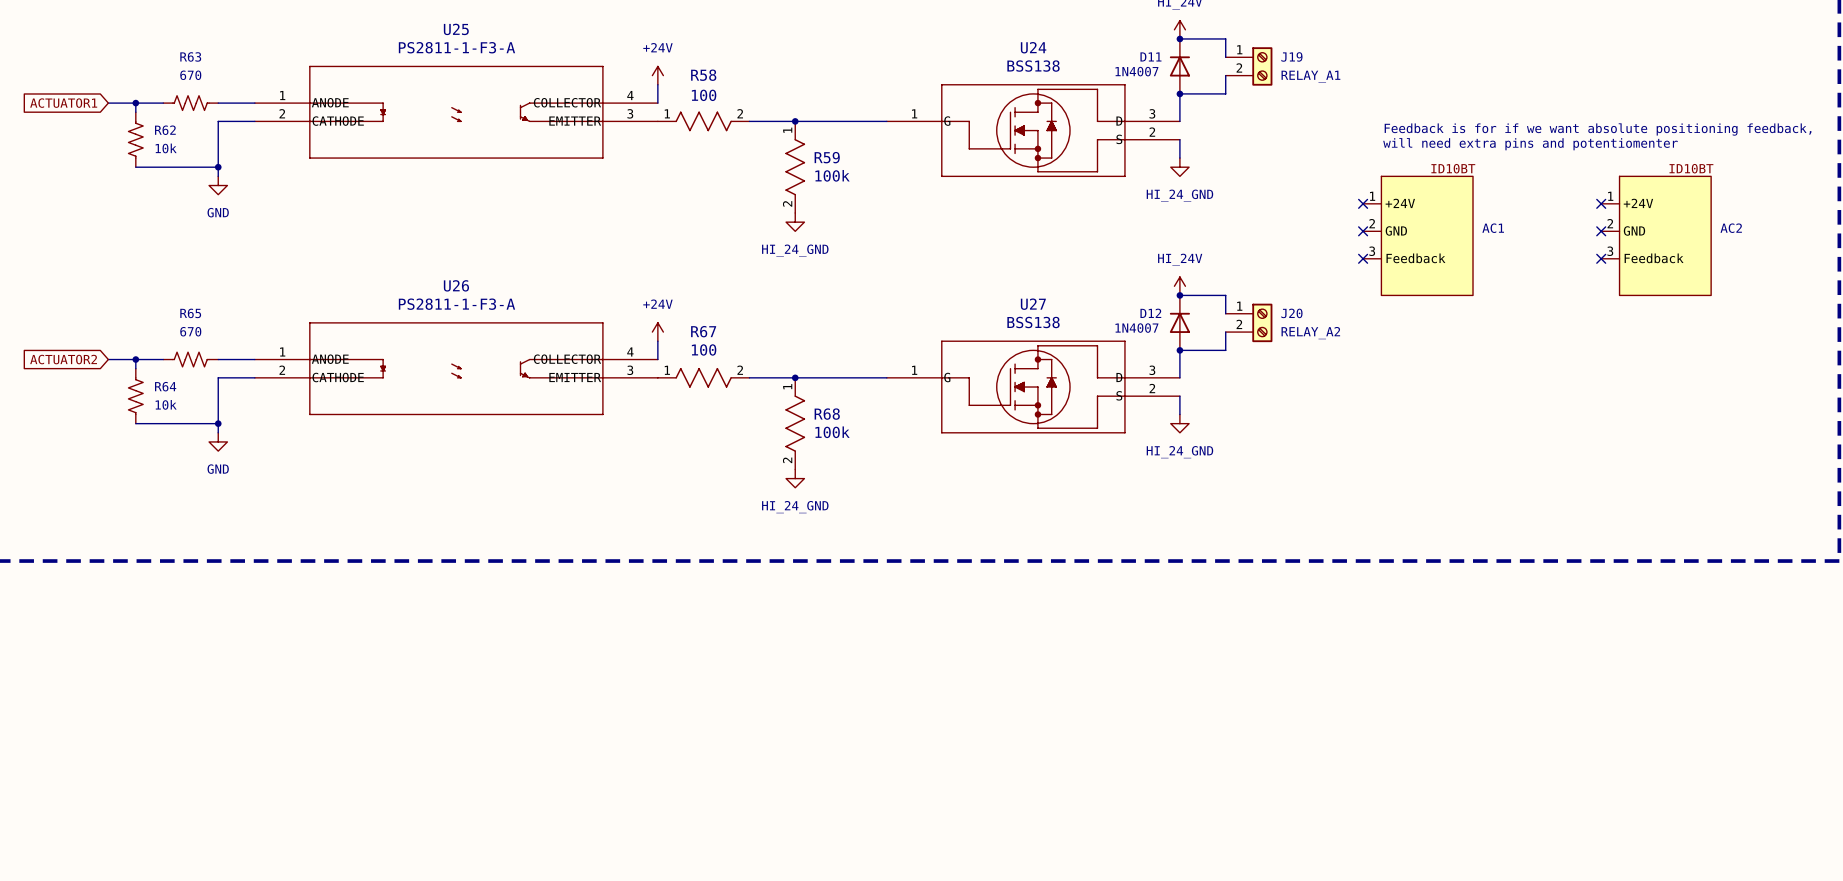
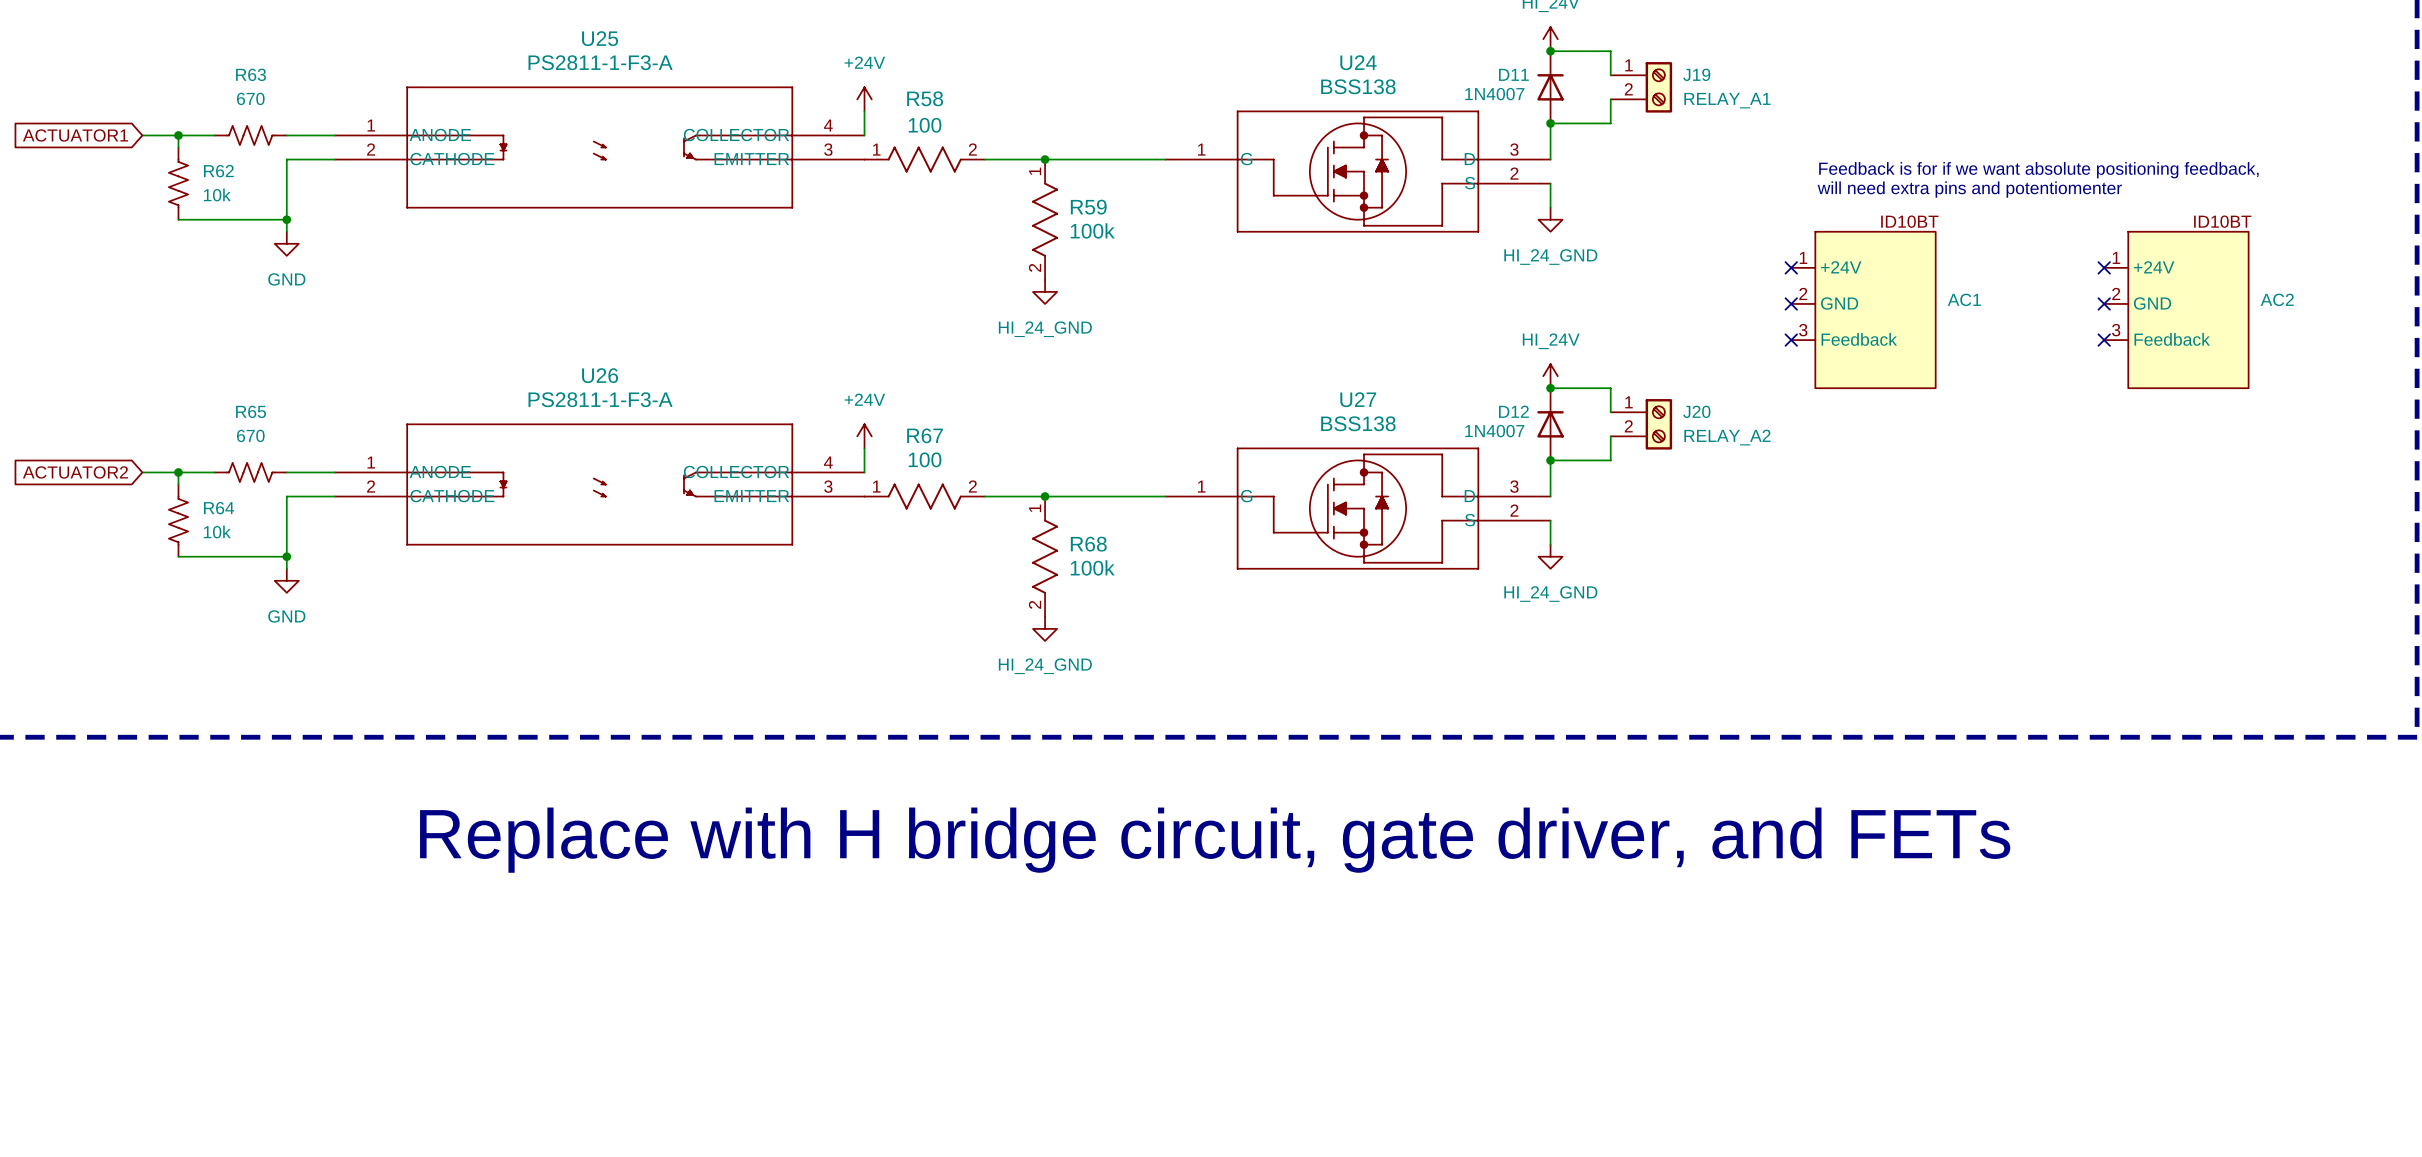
text: none -> Replace with H bridge circuit, gate driver, and FETs (1215, 840)

